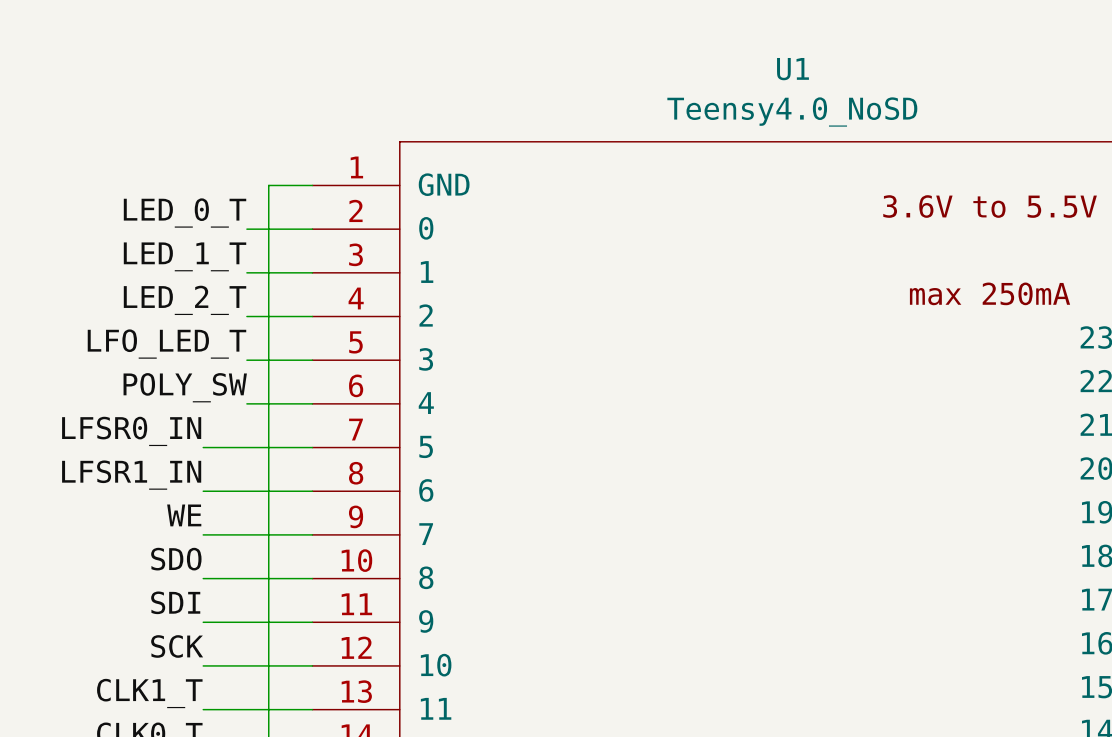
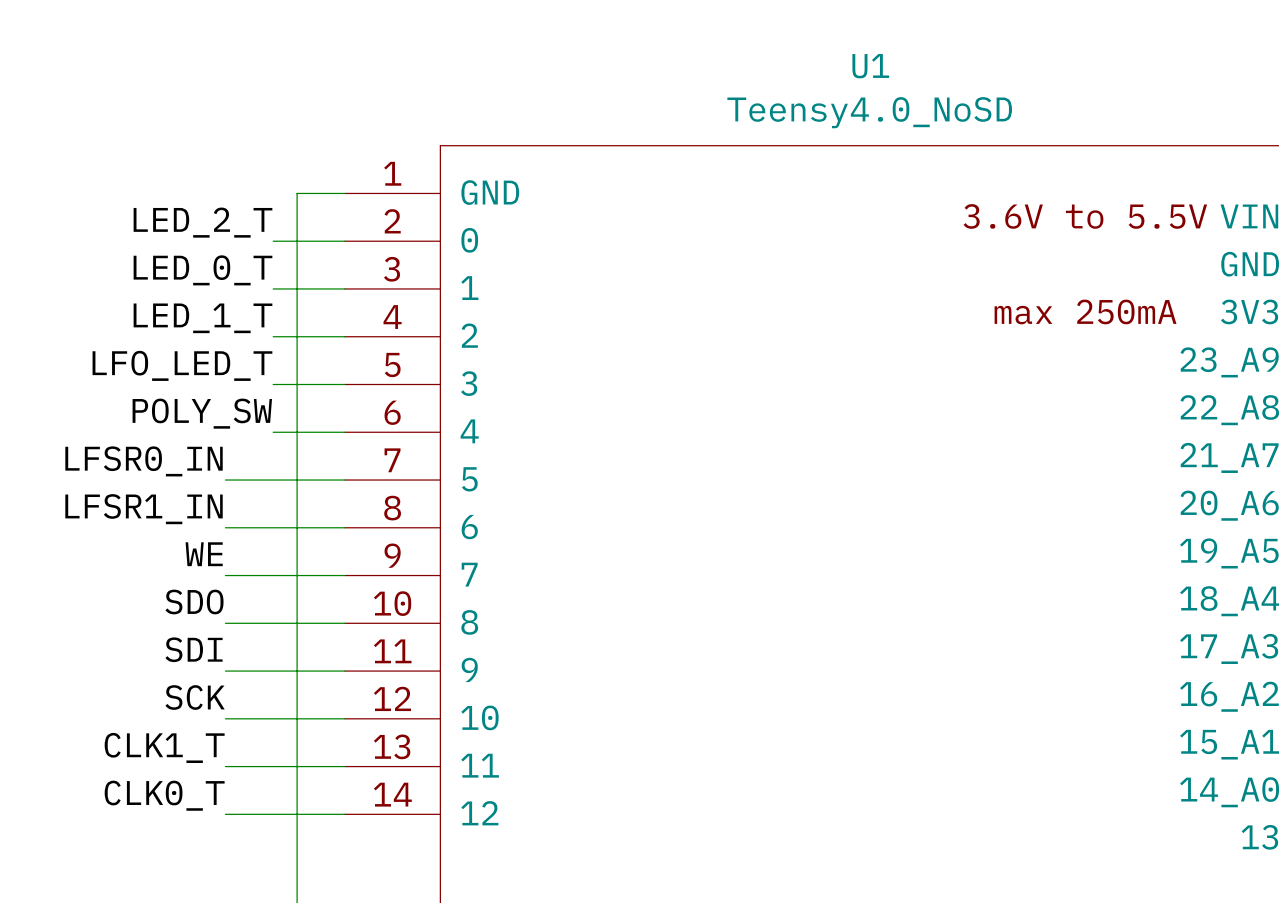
label: LED_0_T (185, 213) -> LED_2_T (202, 222)
label: LED_1_T (185, 256) -> LED_0_T (202, 270)
label: LED_2_T (185, 300) -> LED_1_T (202, 318)

